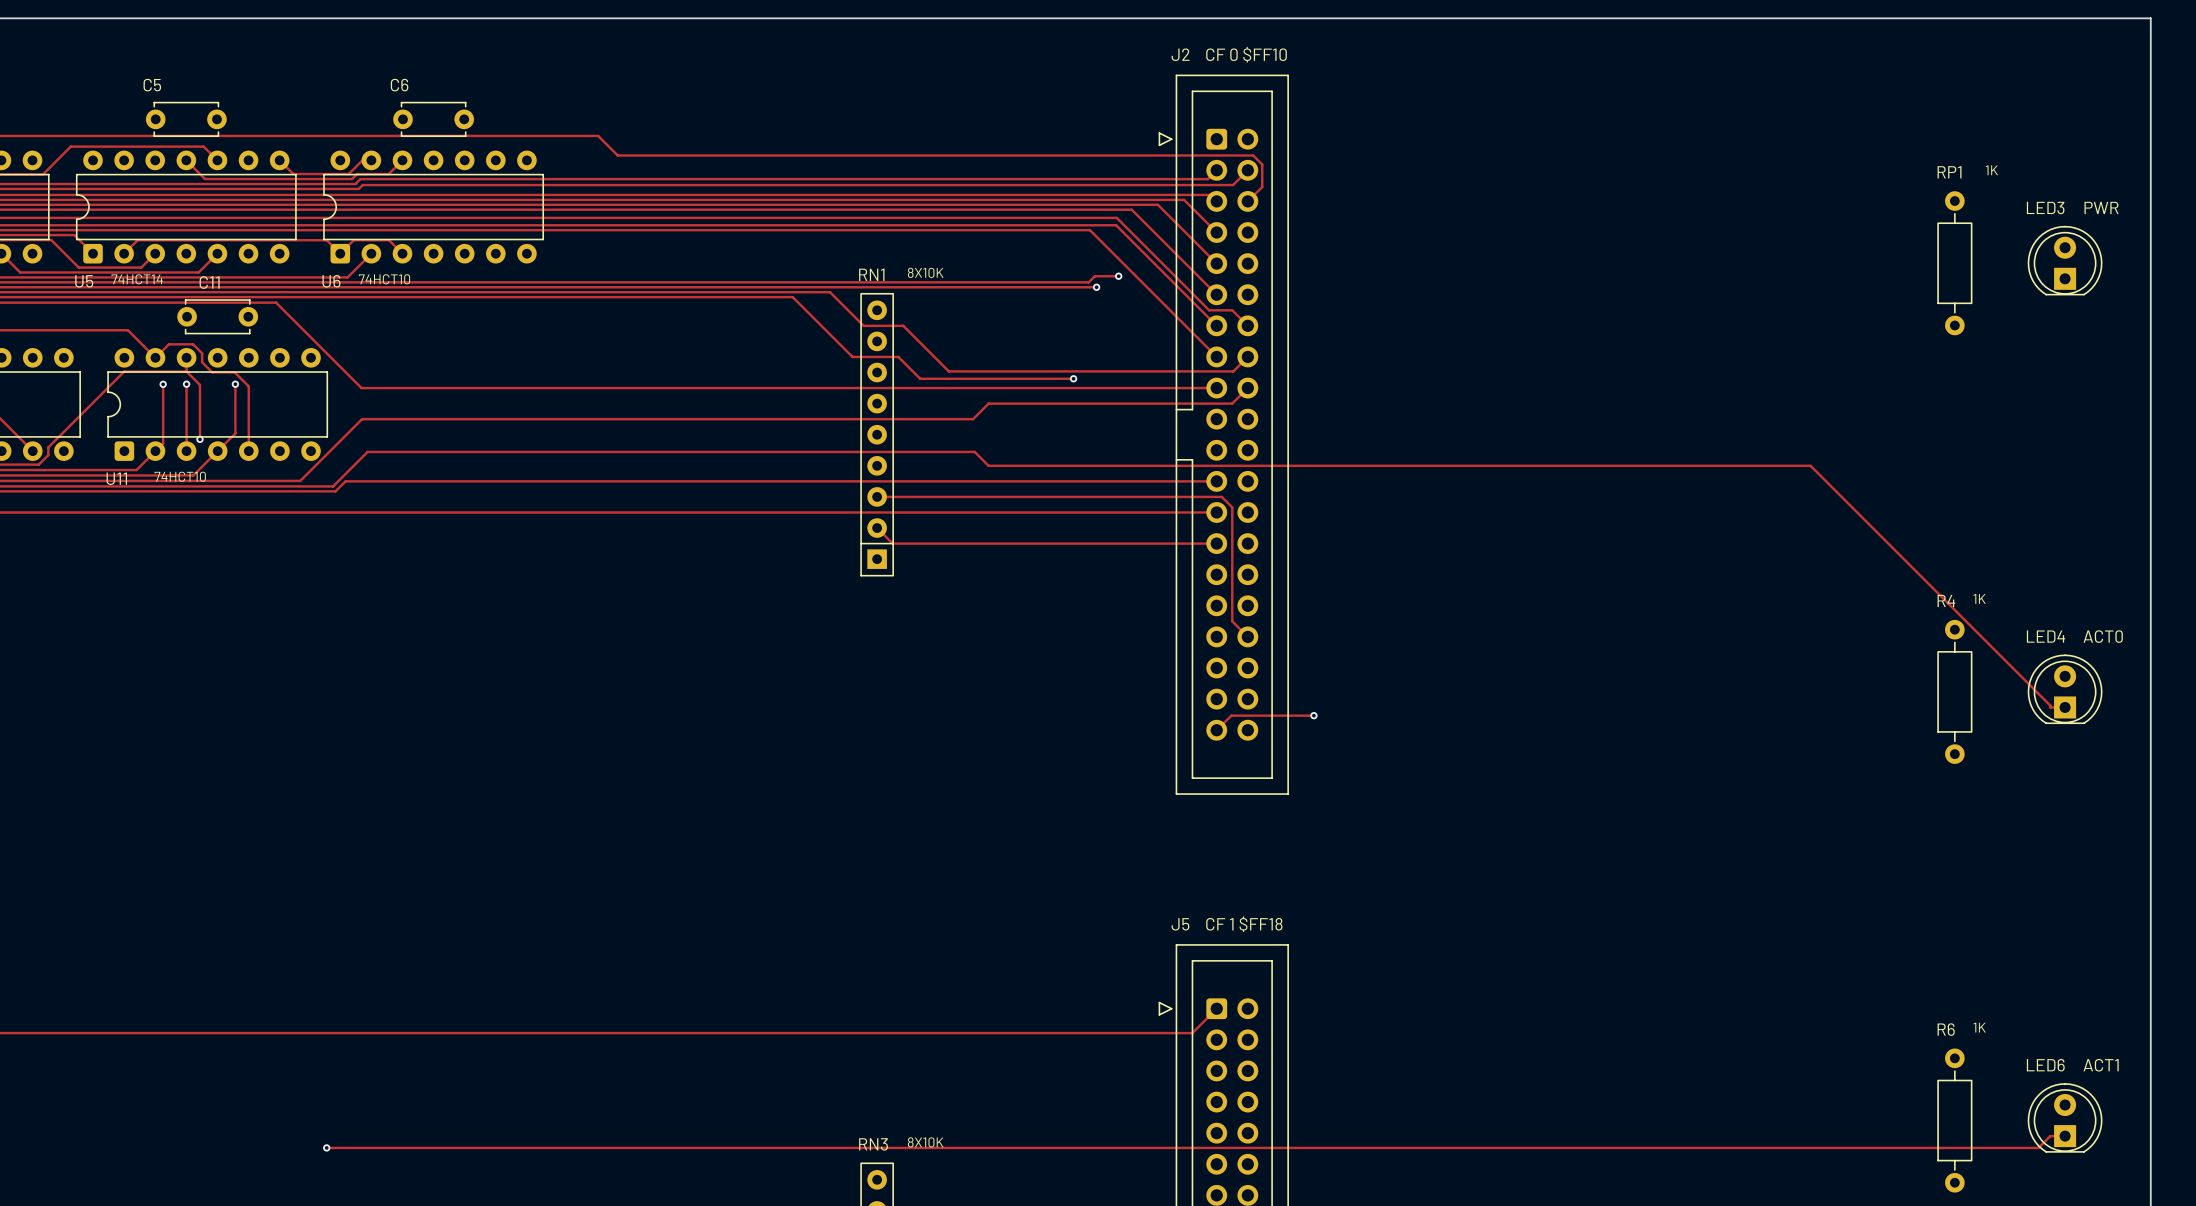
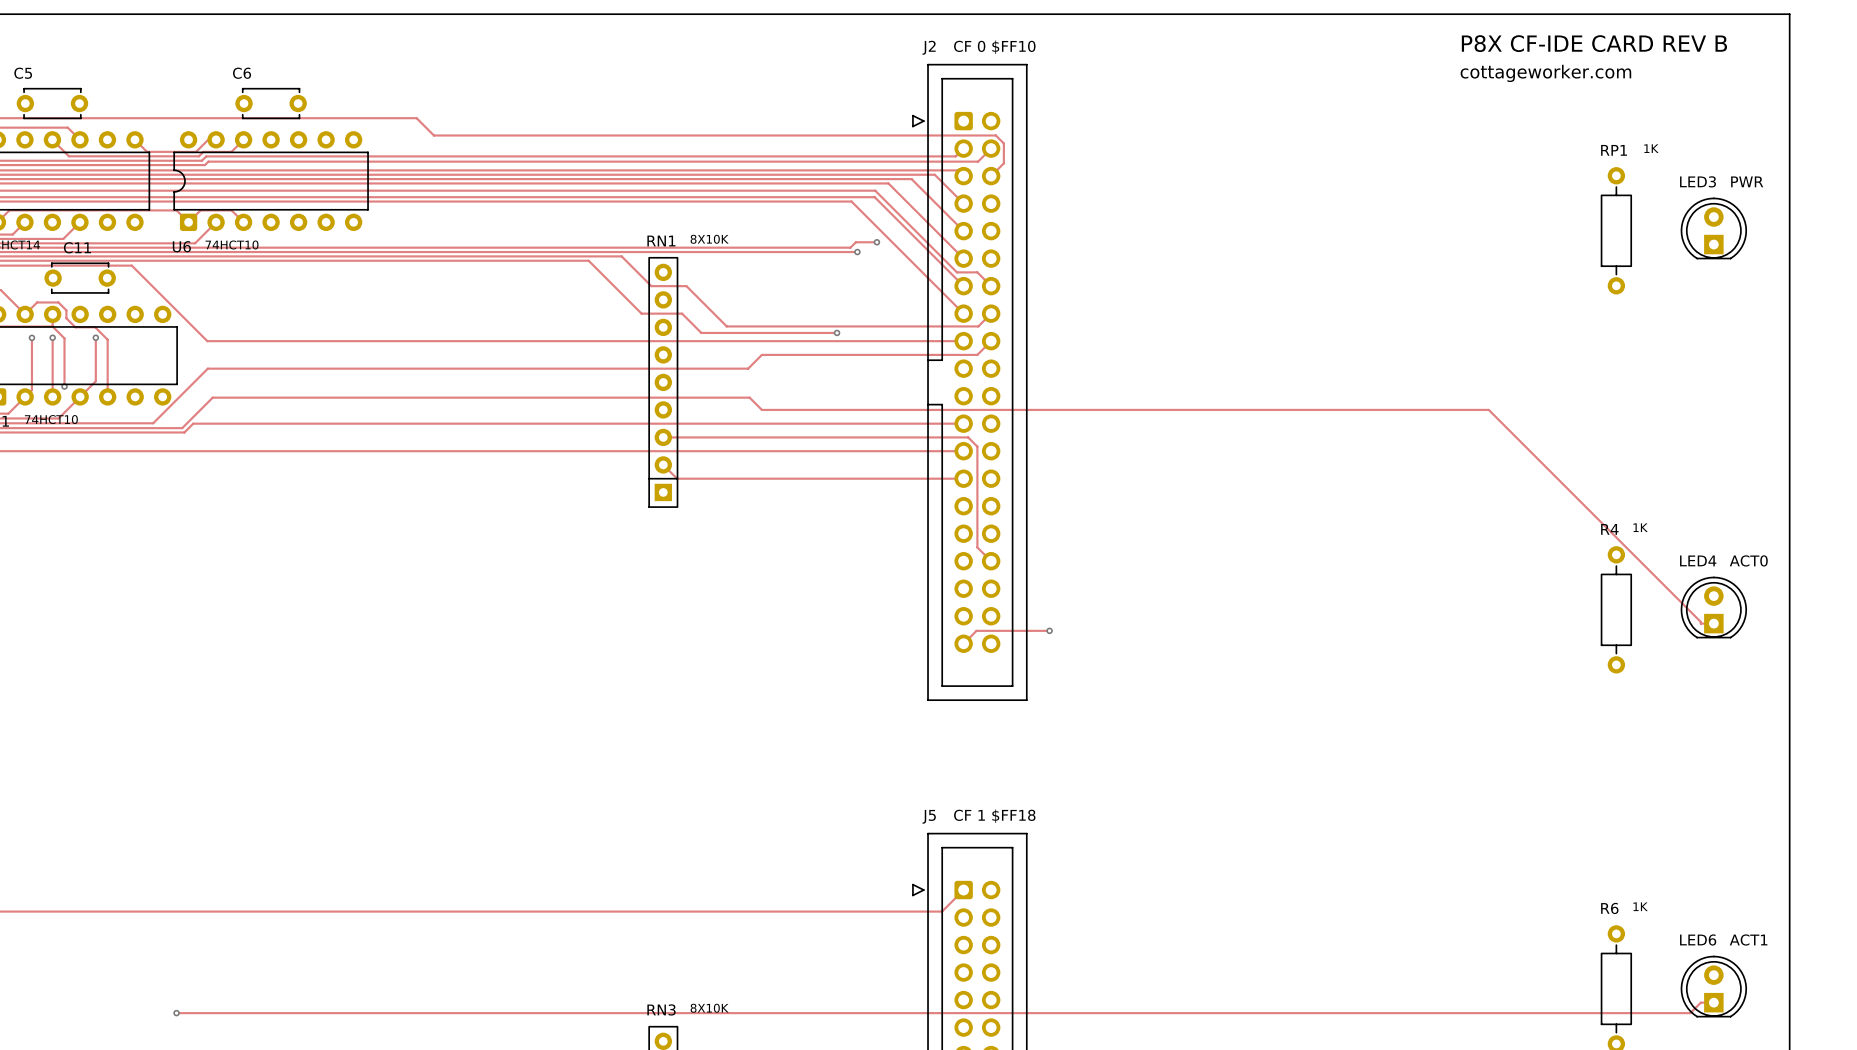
text: none -> P8X CF-IDE CARD REV B (1594, 43)
text: none -> cottageworker.com (1545, 73)

